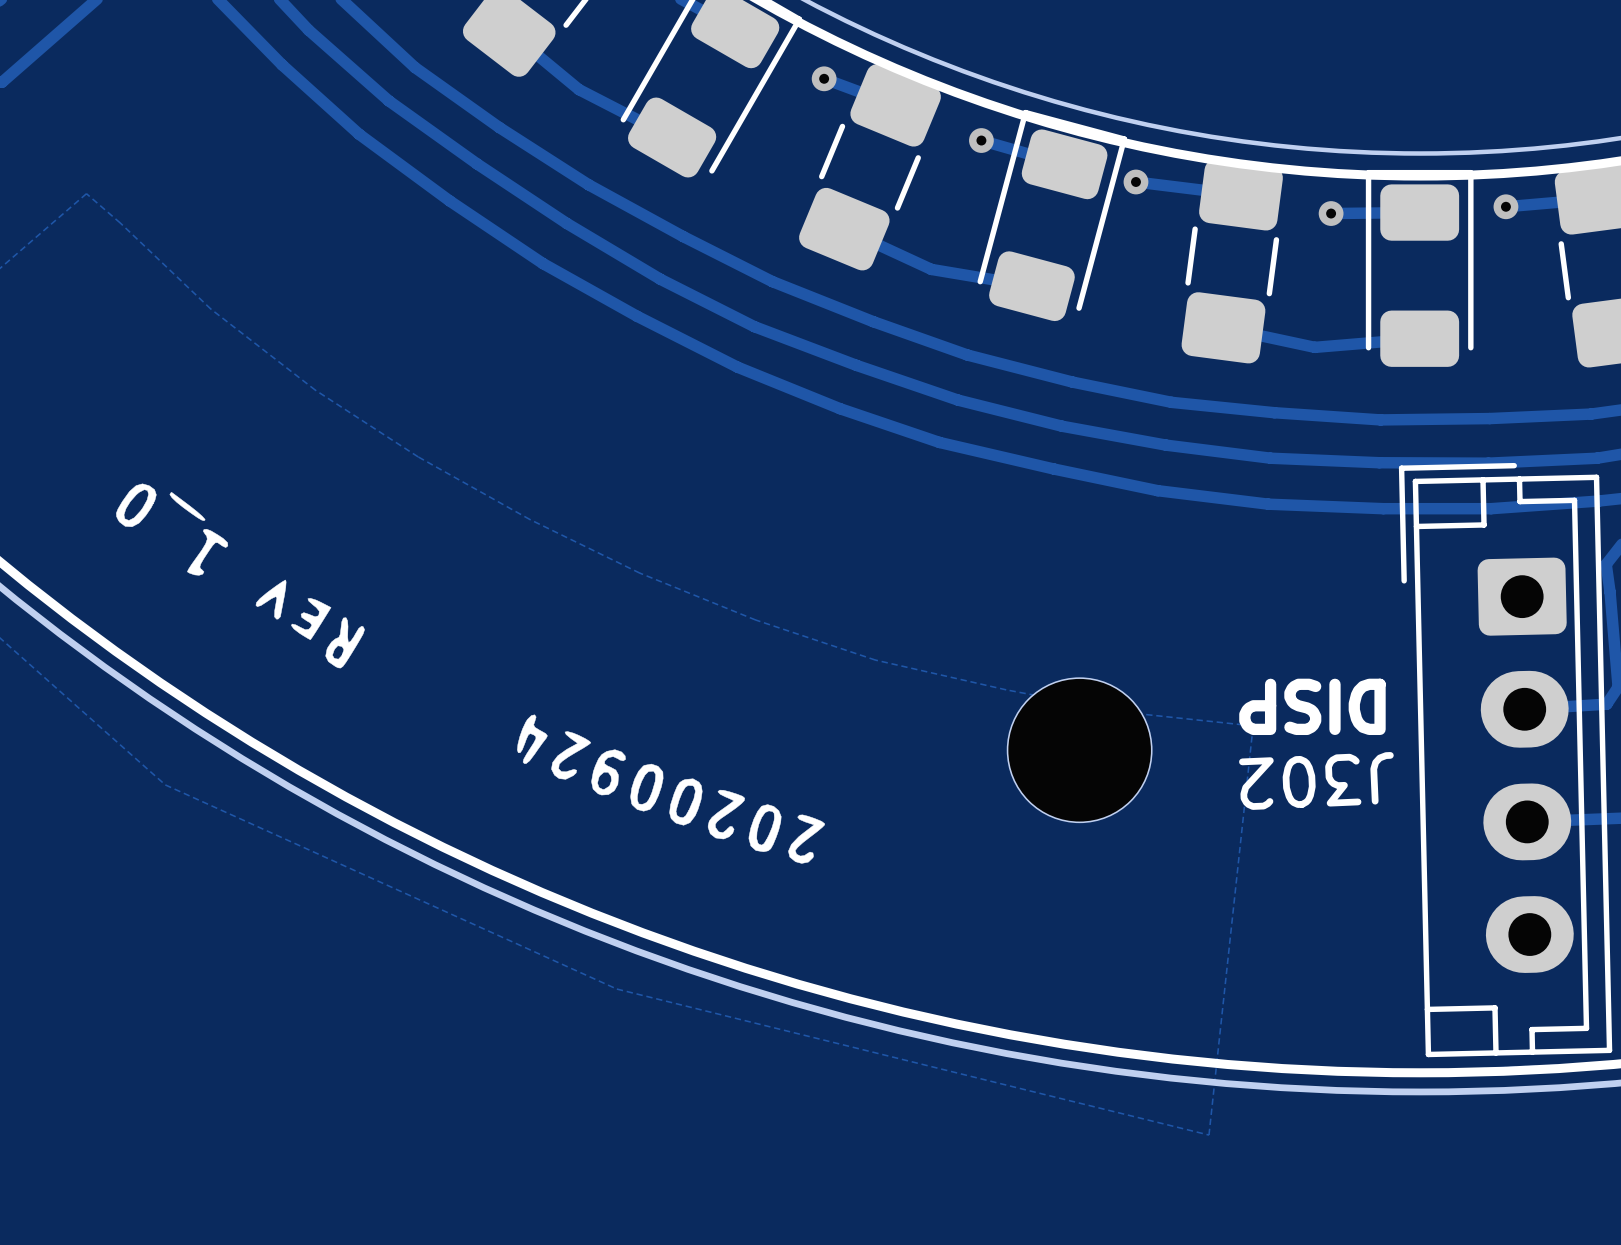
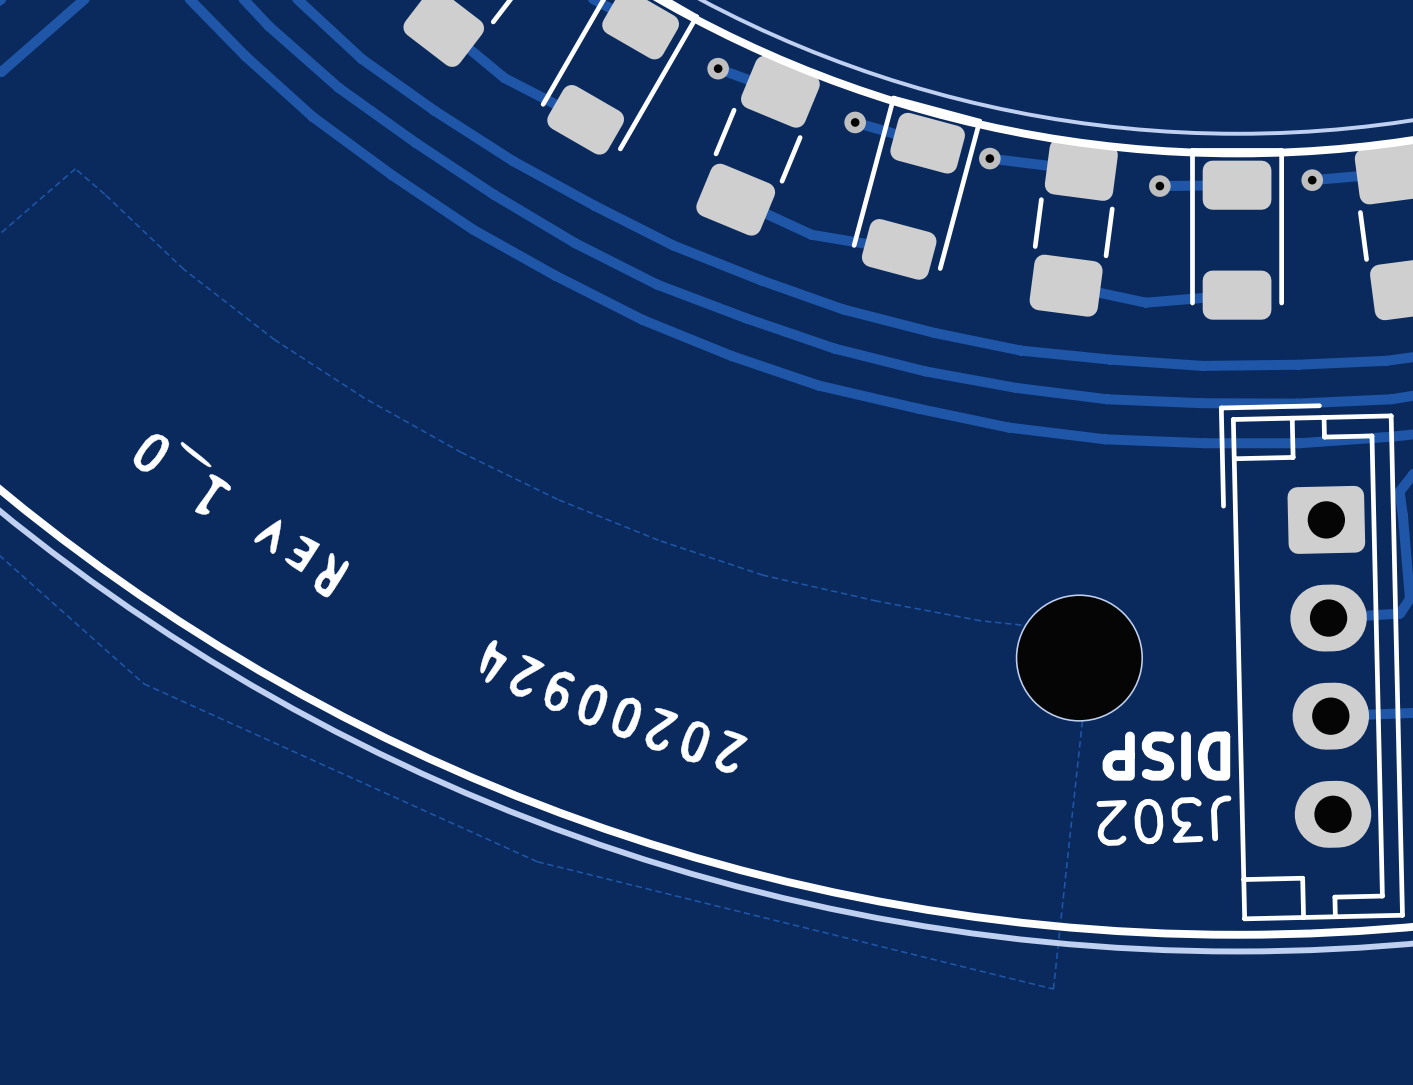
drawing shape: [116, 483, 825, 864] -> [133, 433, 748, 774]
text position: DISP (1312, 706) -> DISP (1166, 756)
part position: (1079, 750) -> (1079, 658)
J302 name position: J302 (1316, 780) -> J302 (1163, 820)

